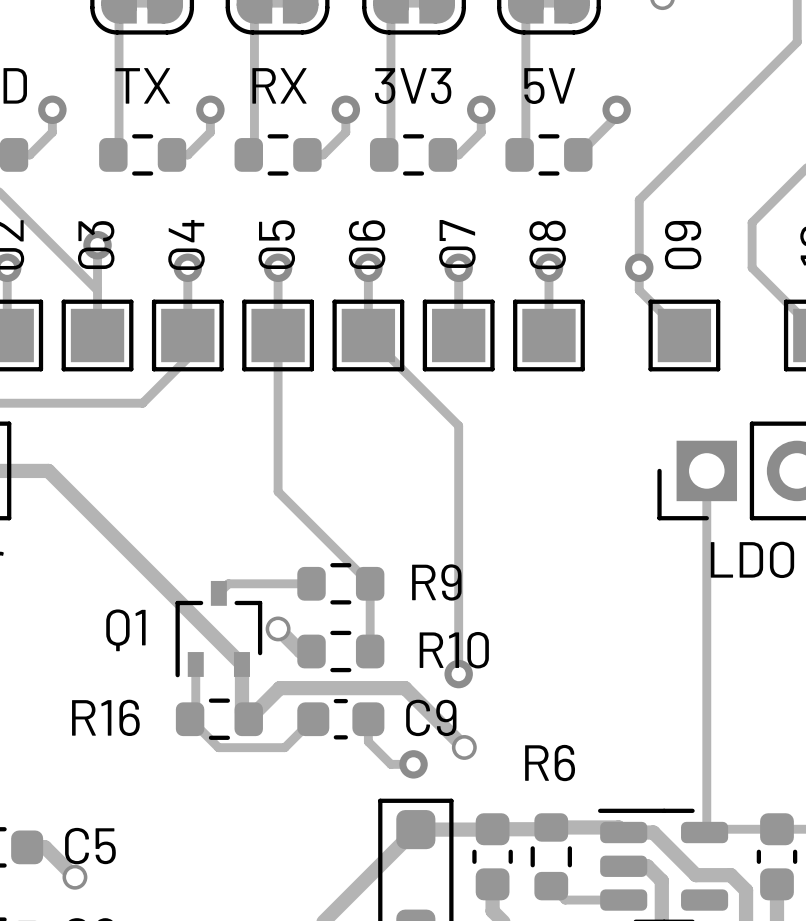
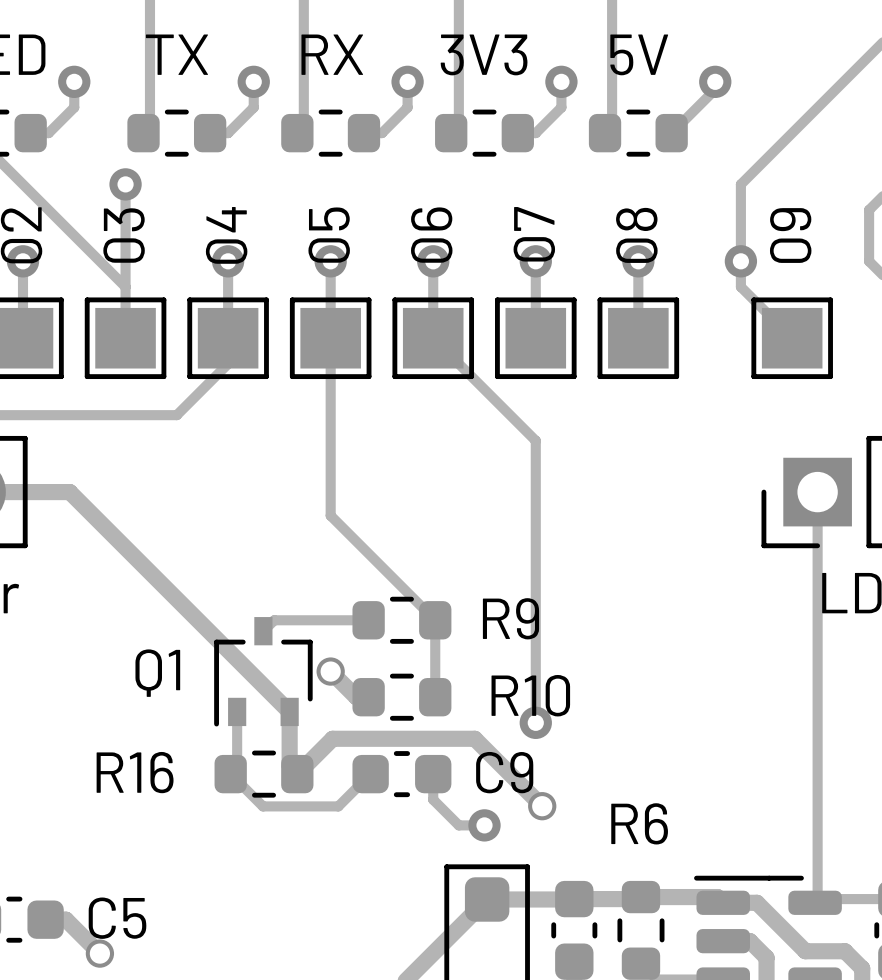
track: none -> (125, 184) (125, 235)
via position: (97, 245) -> (125, 184)

